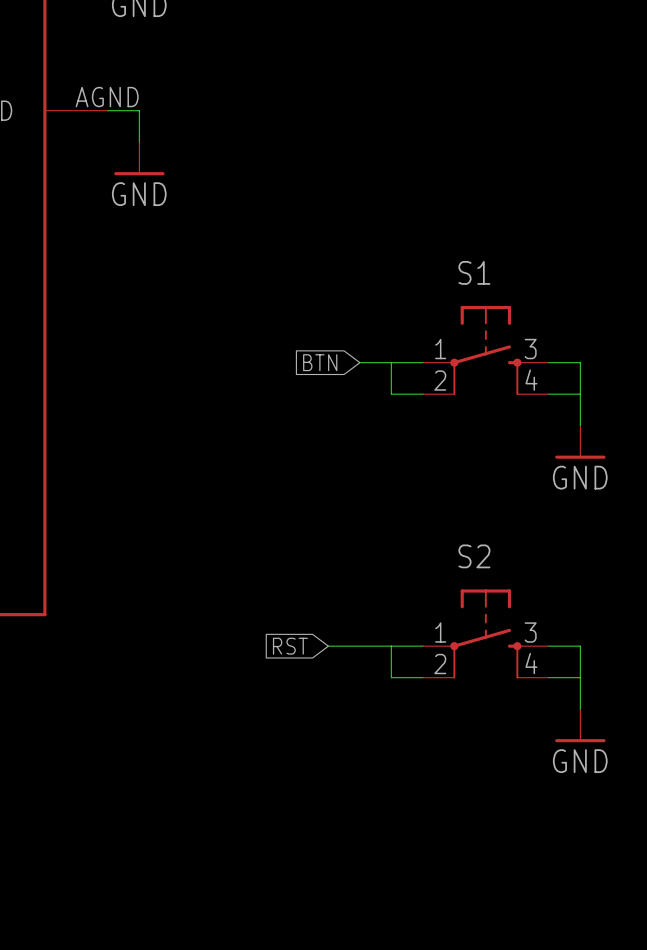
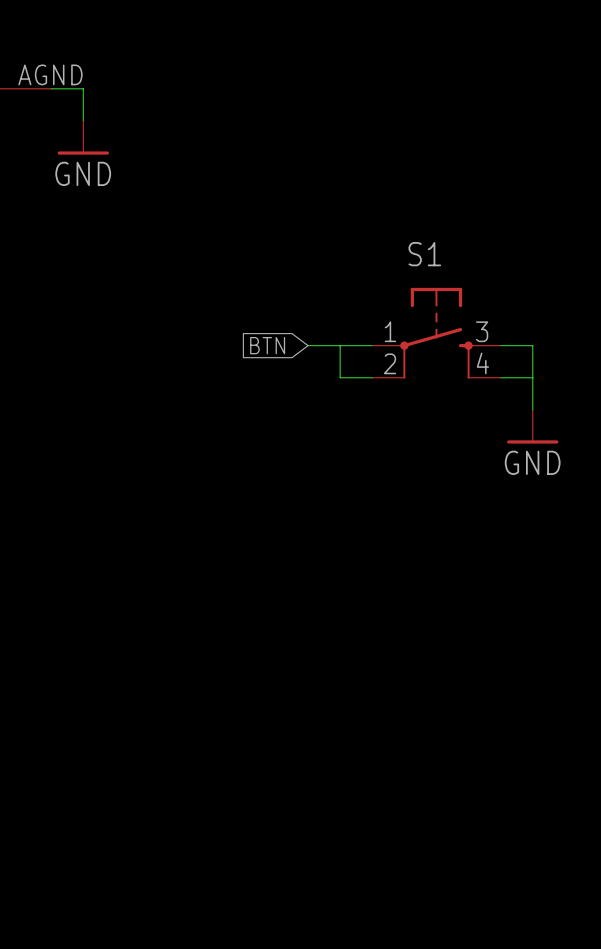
S2: (485, 634) -> none
global label: RST (290, 646) -> none
wire: (328, 646) (422, 646) -> none
wire: (391, 646) (391, 677) (422, 677) -> none
wire: (548, 646) (580, 646) (580, 709) -> none
wire: (548, 677) (580, 677) -> none
power symbol: GND (580, 725) -> none

